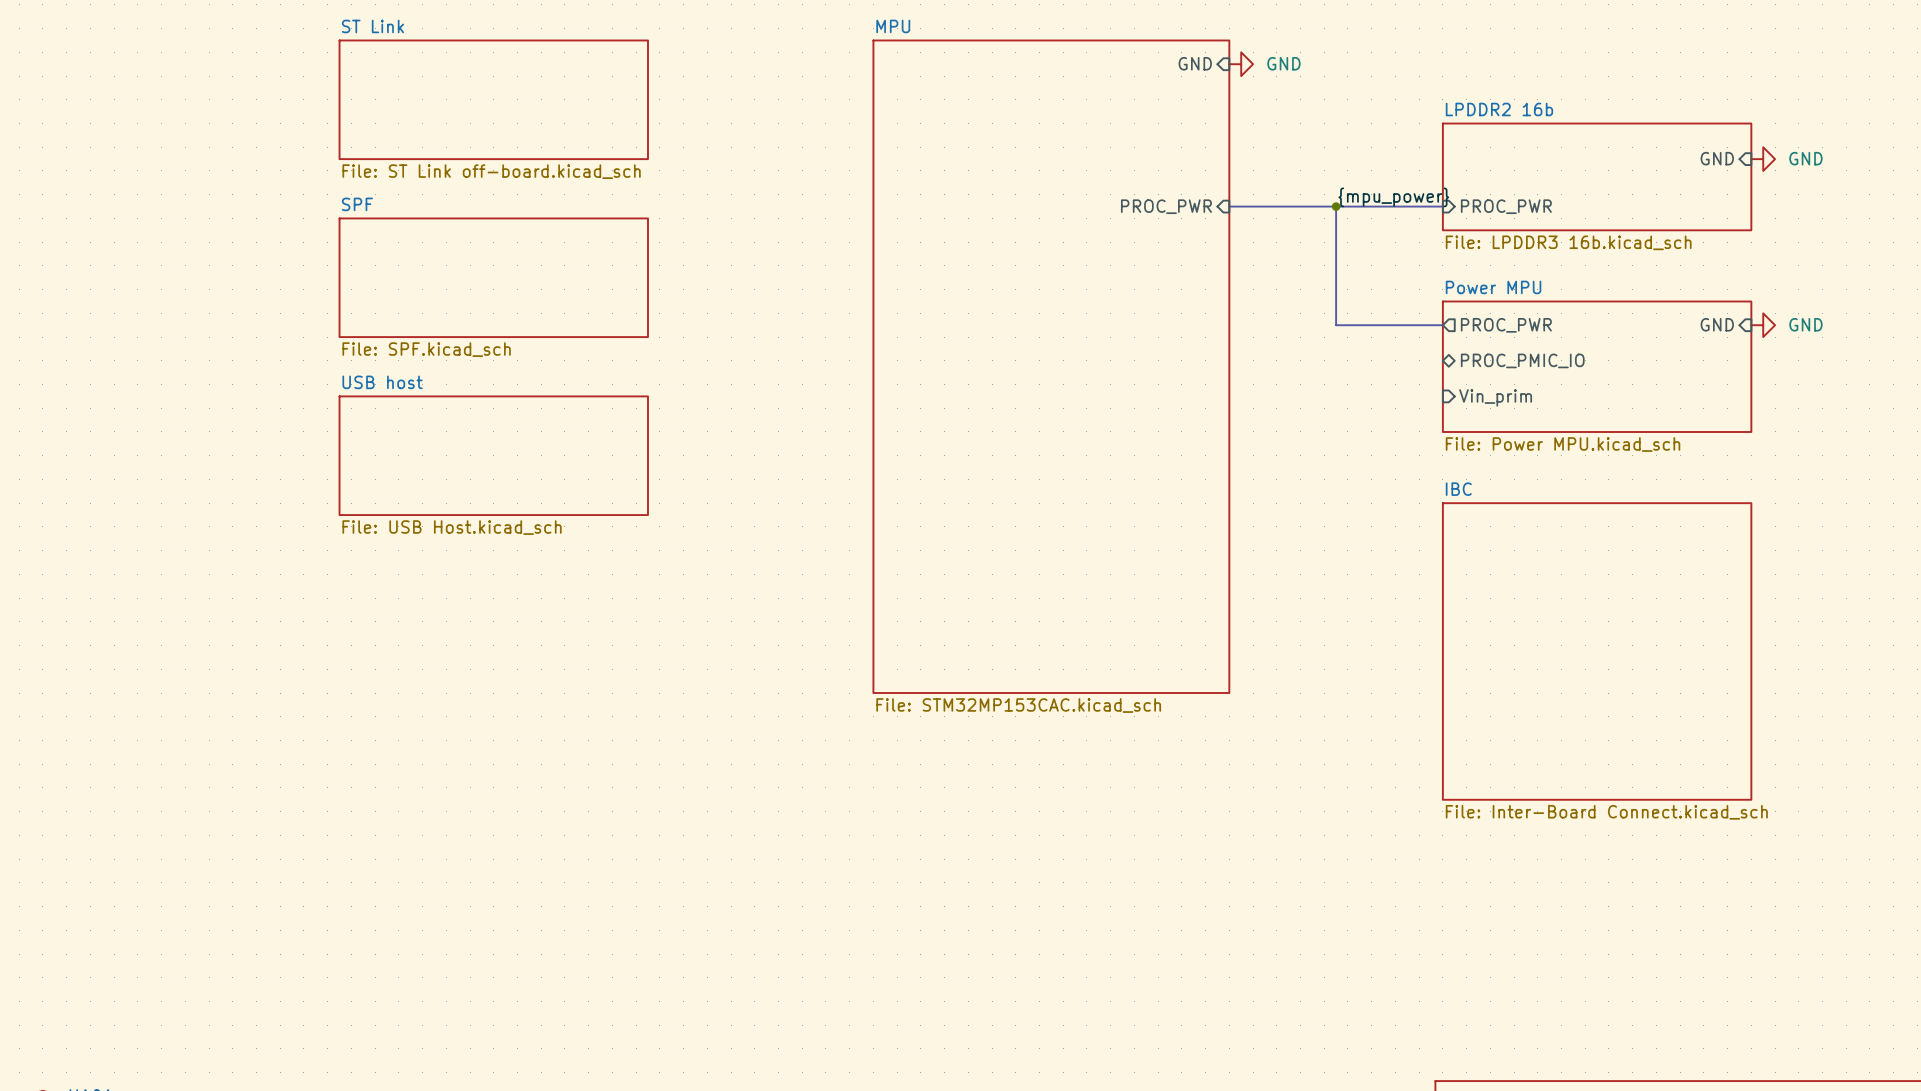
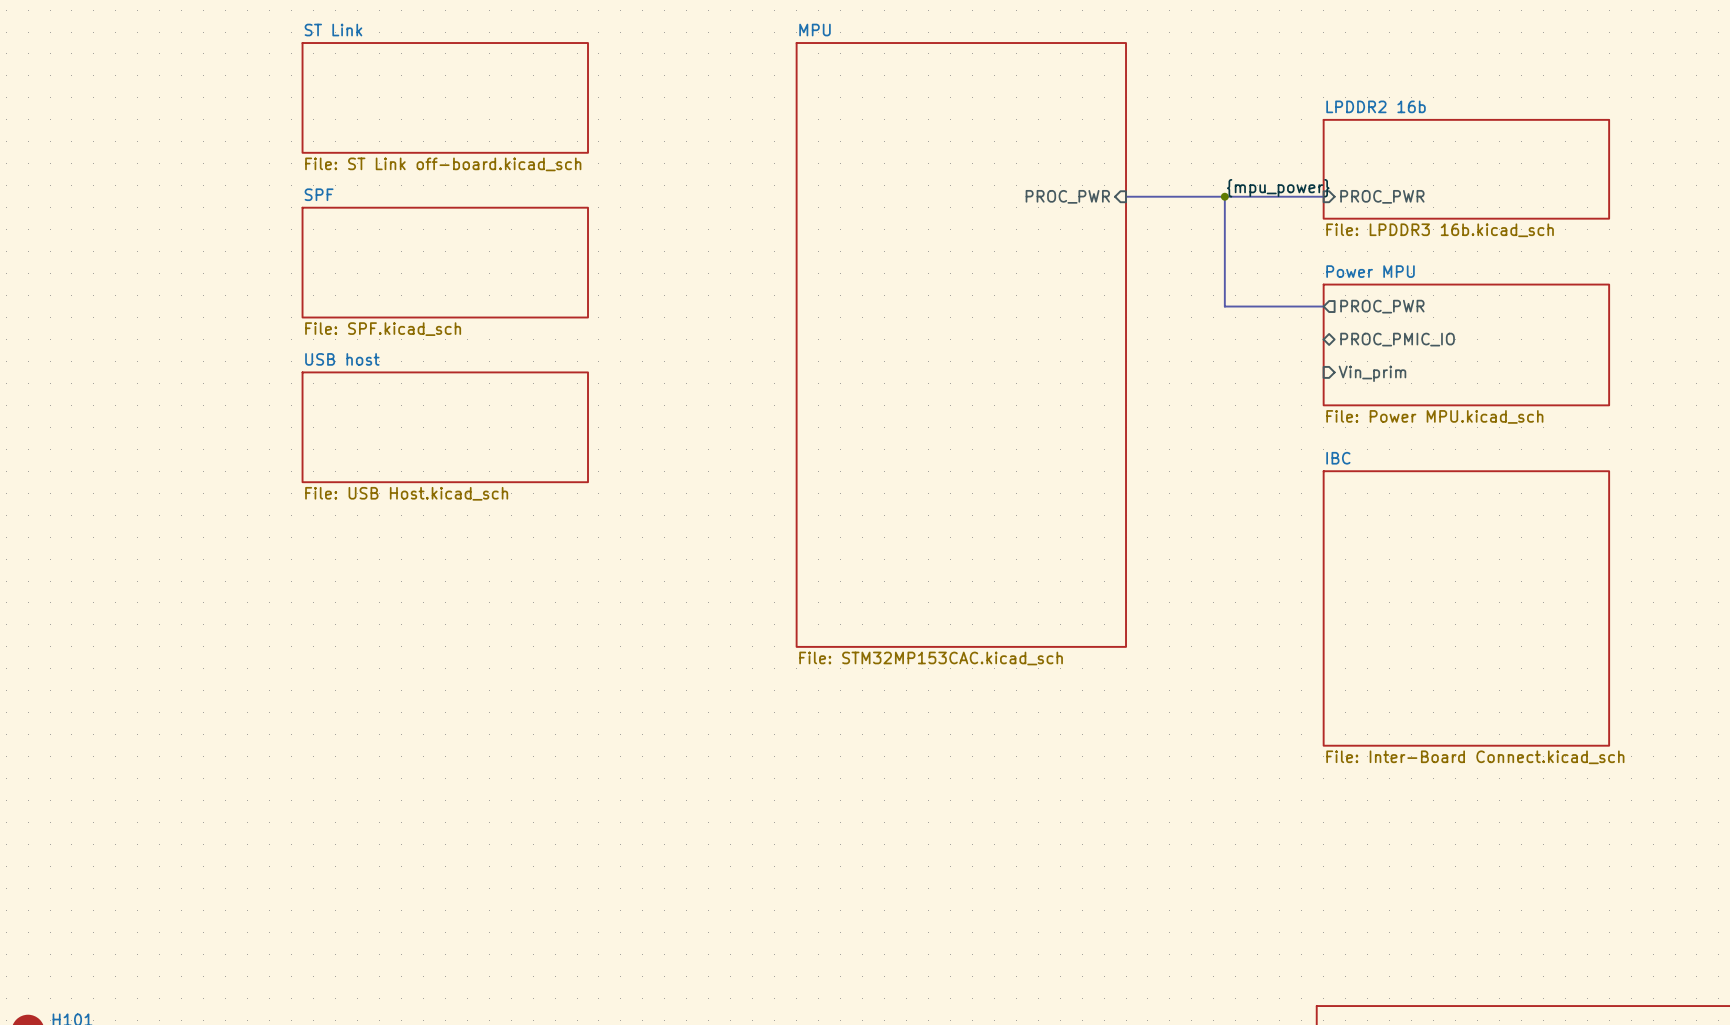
sheet pin: GND (1195, 63) -> none
power symbol: GND (1241, 64) -> none
sheet pin: GND (1717, 158) -> none
power symbol: GND (1763, 159) -> none
sheet pin: GND (1717, 324) -> none
power symbol: GND (1763, 325) -> none

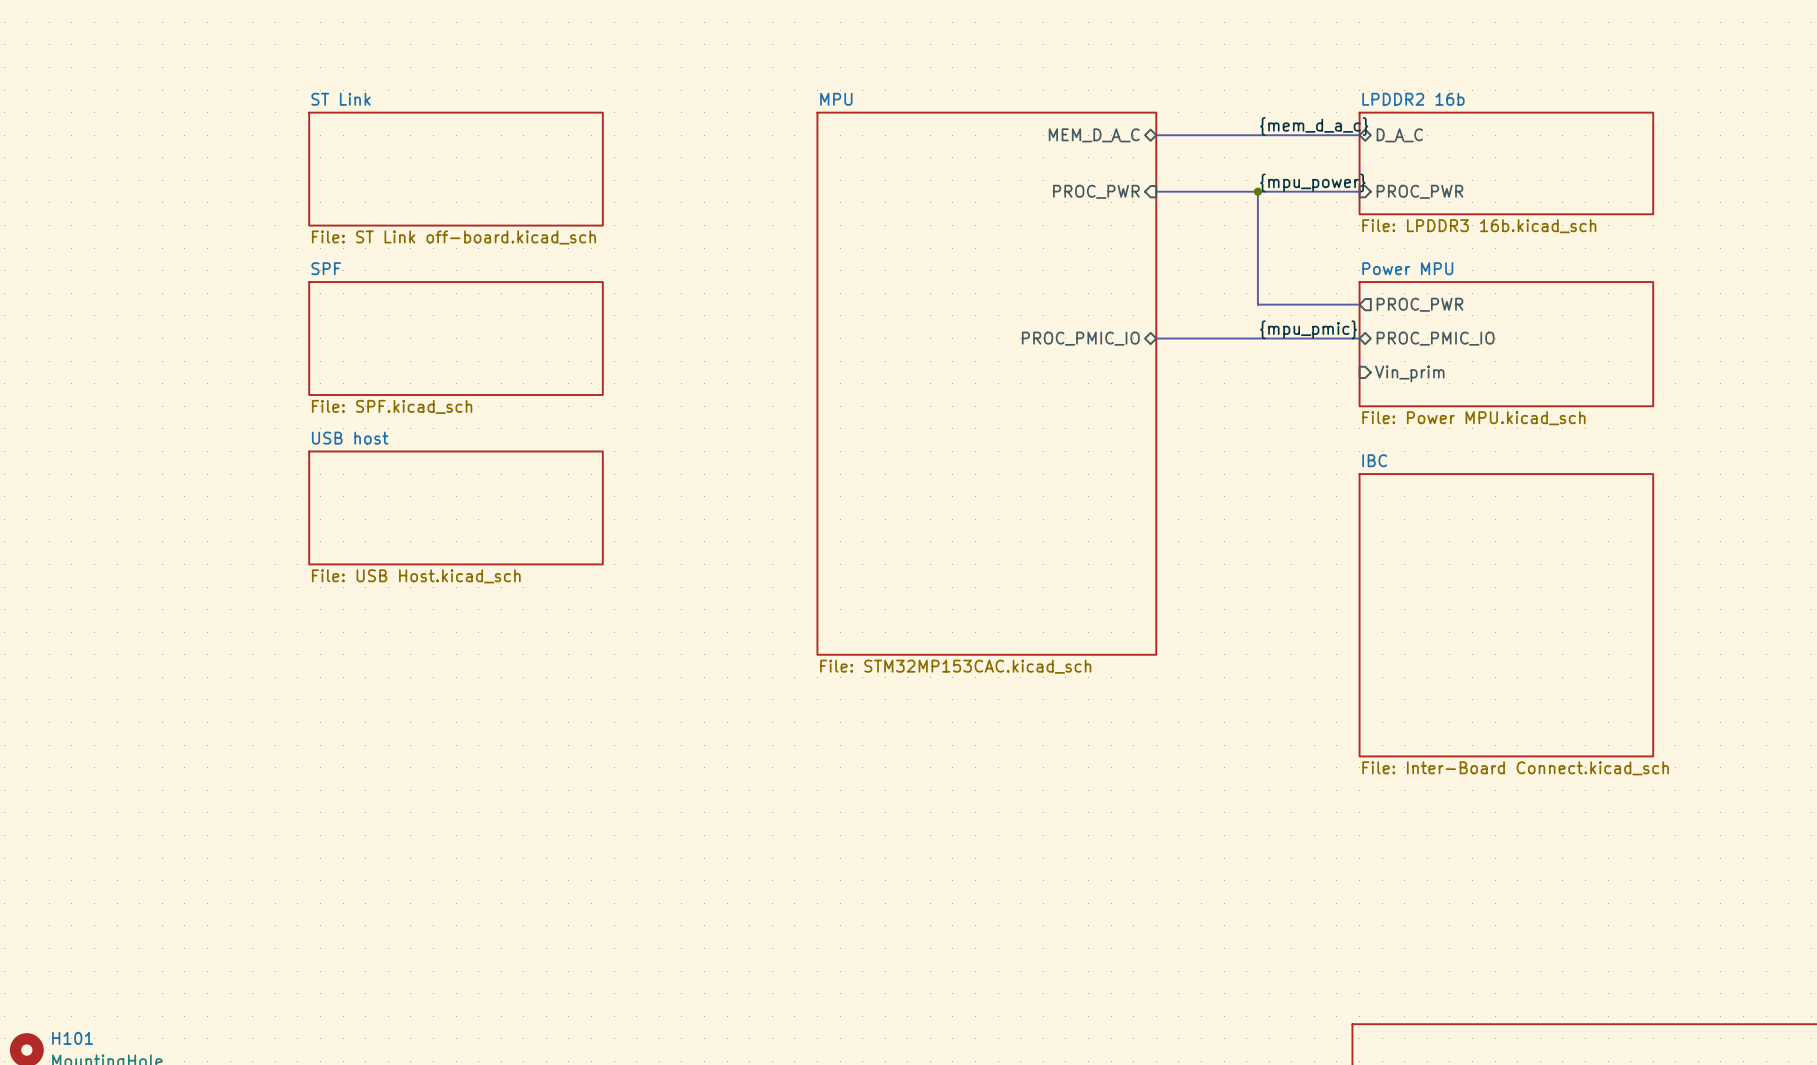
sheet ST Link position: (445, 97) -> (456, 169)
label: none -> {mem_d_a_c} (1314, 126)
sheet pin: none -> MEM_D_A_C (1094, 135)
bus: none -> (1156, 135) (1359, 135)
sheet pin: none -> D_A_C (1399, 135)
sheet SPF position: (445, 262) -> (456, 338)
label: none -> {mpu_pmic} (1308, 329)
sheet pin: none -> PROC_PMIC_IO (1080, 338)
bus: none -> (1156, 338) (1359, 338)
sheet MPU: File: STM32MP153CAC.kicad_sch (961, 344) -> none
sheet MPU: none -> File: STM32MP153CAC.kicad_sch (986, 383)
sheet USB host position: (445, 427) -> (456, 507)

